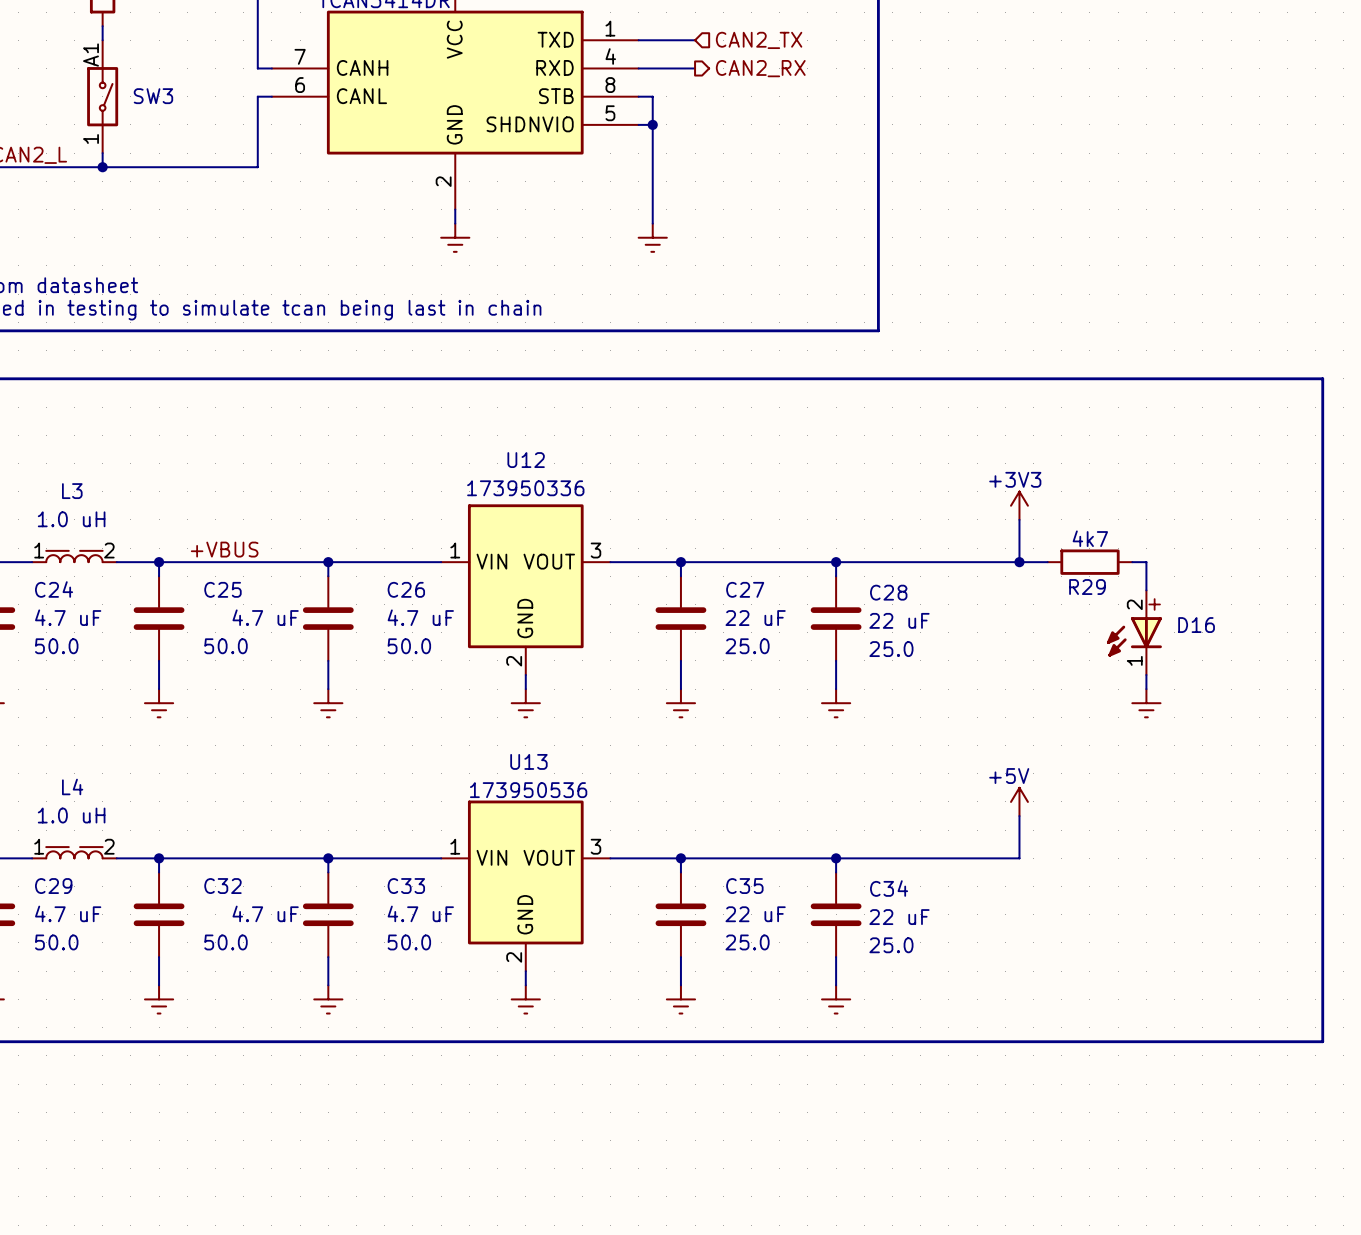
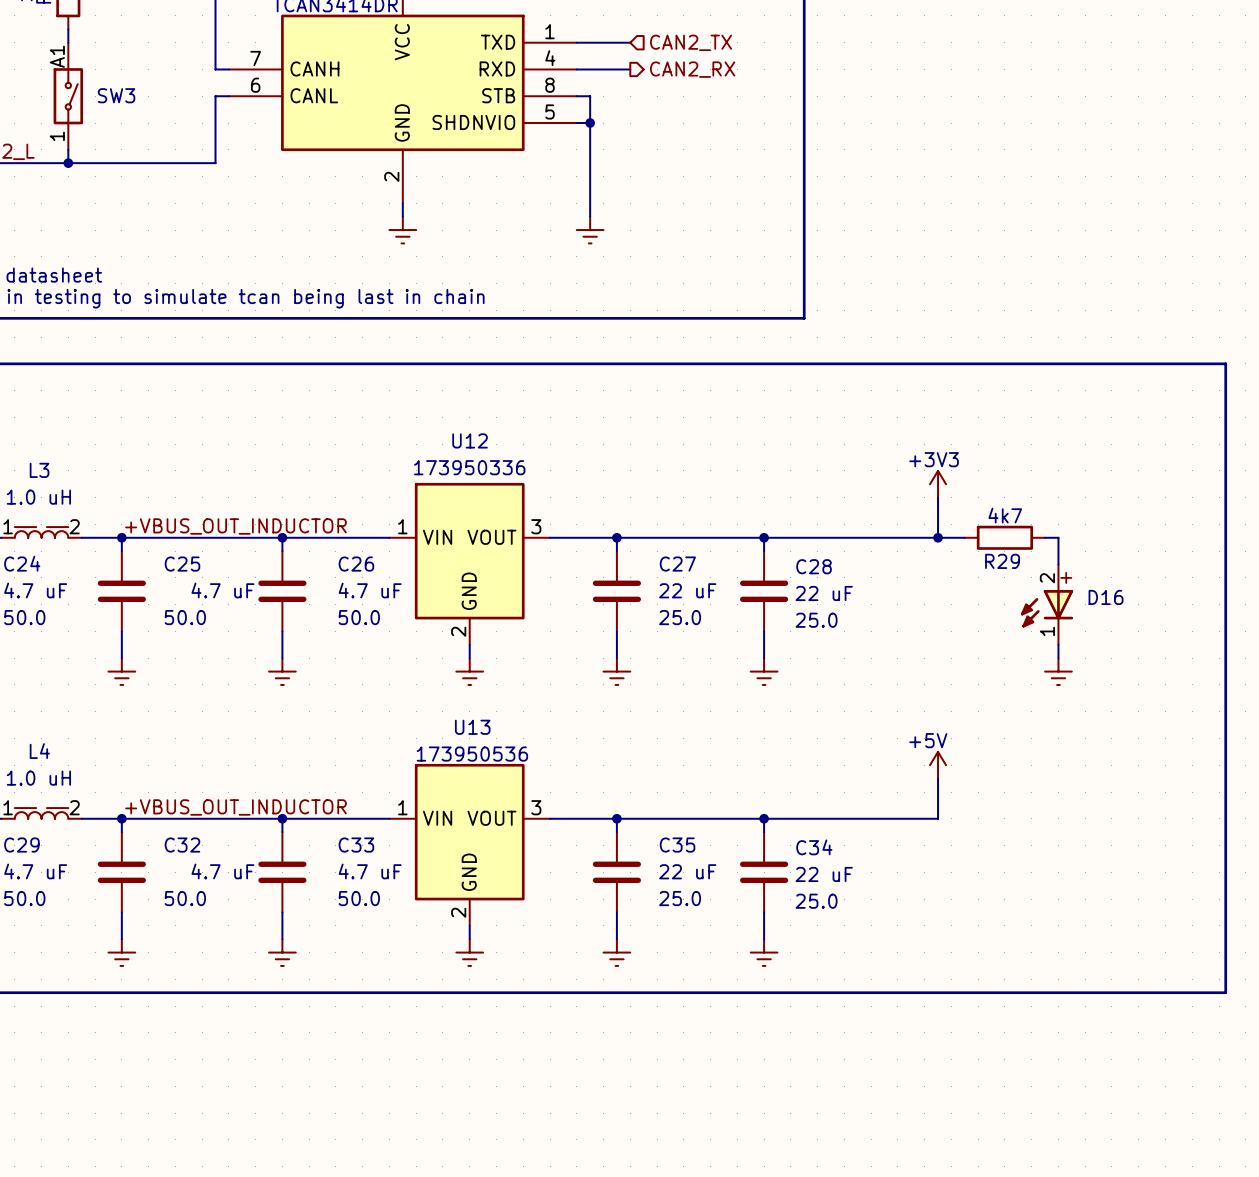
label: +VBUS (224, 549) -> none
label: none -> +VBUS_OUT_INDUCTOR (235, 526)
label: none -> +VBUS_OUT_INDUCTOR (235, 807)

